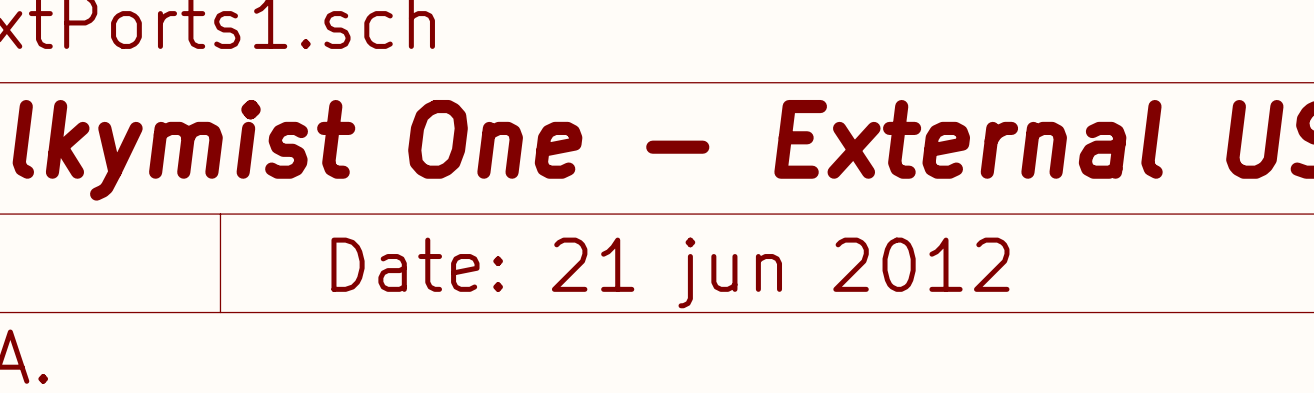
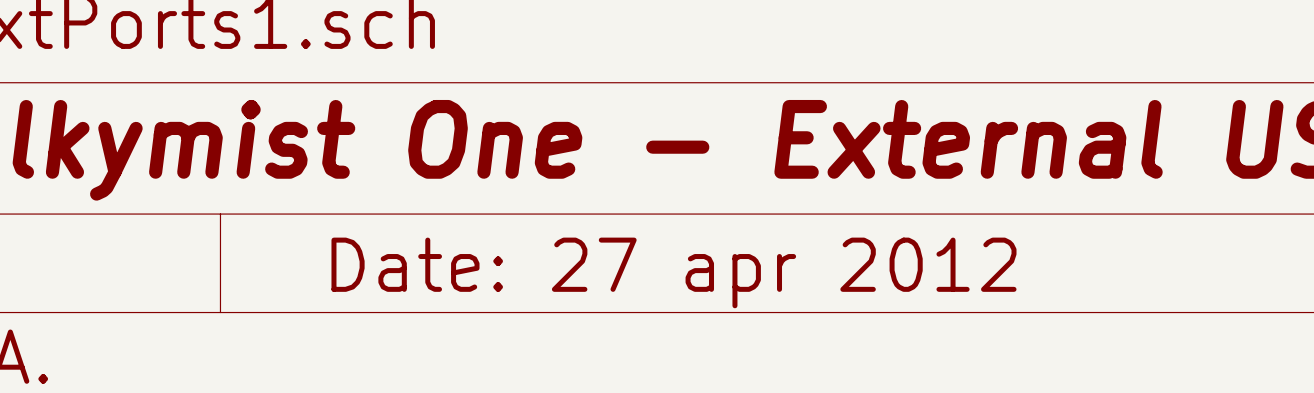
title block: Date: 21 jun 2012 (670, 272) -> Date: 27 apr 2012 (673, 272)

